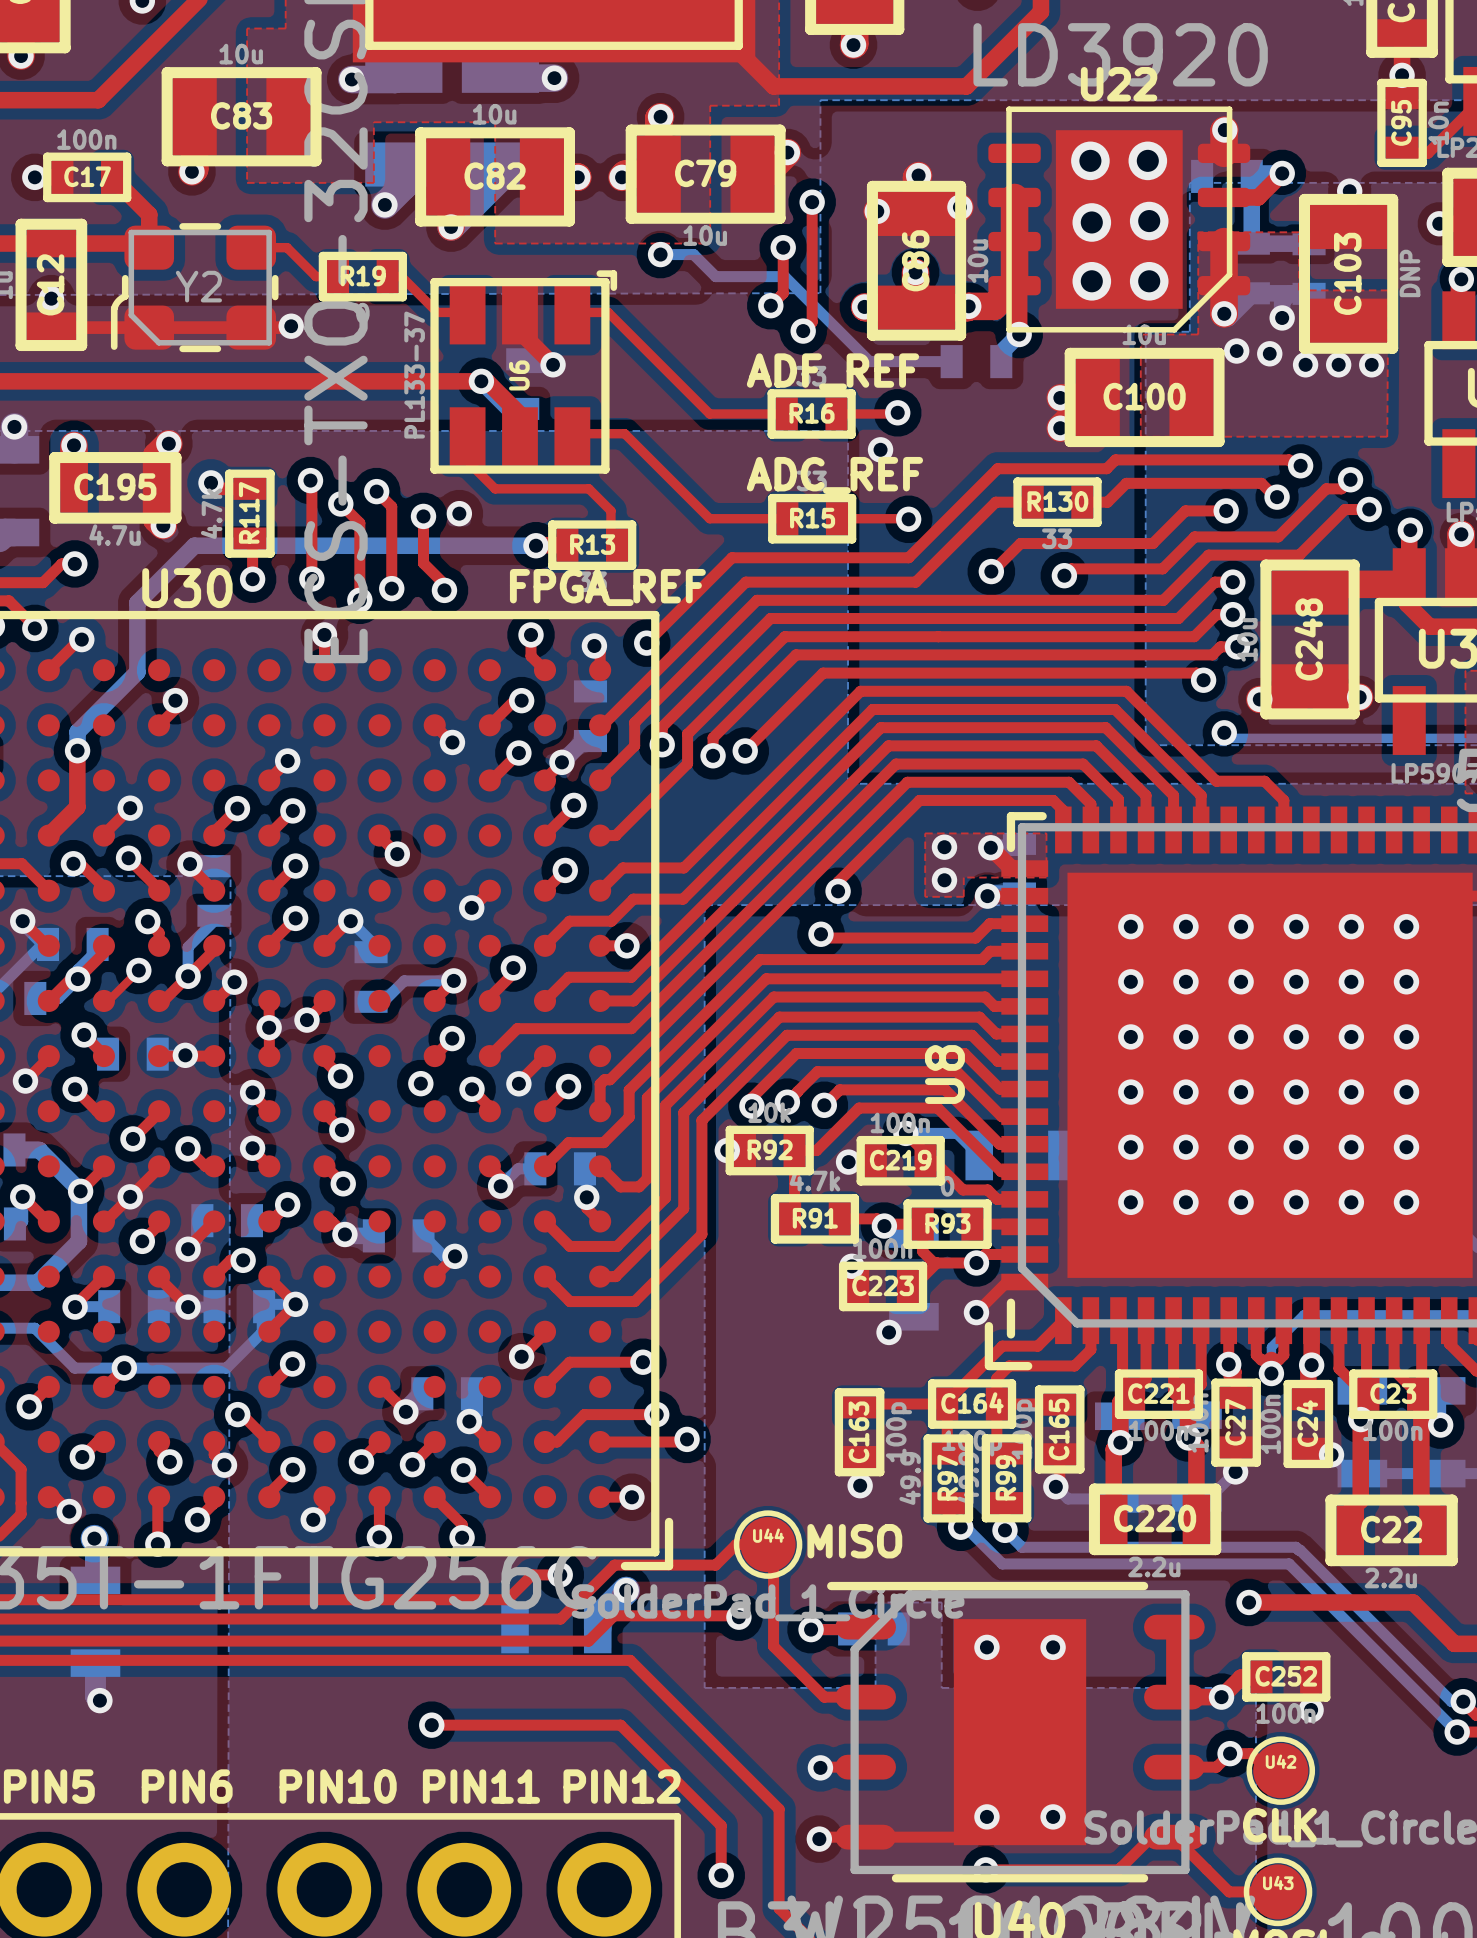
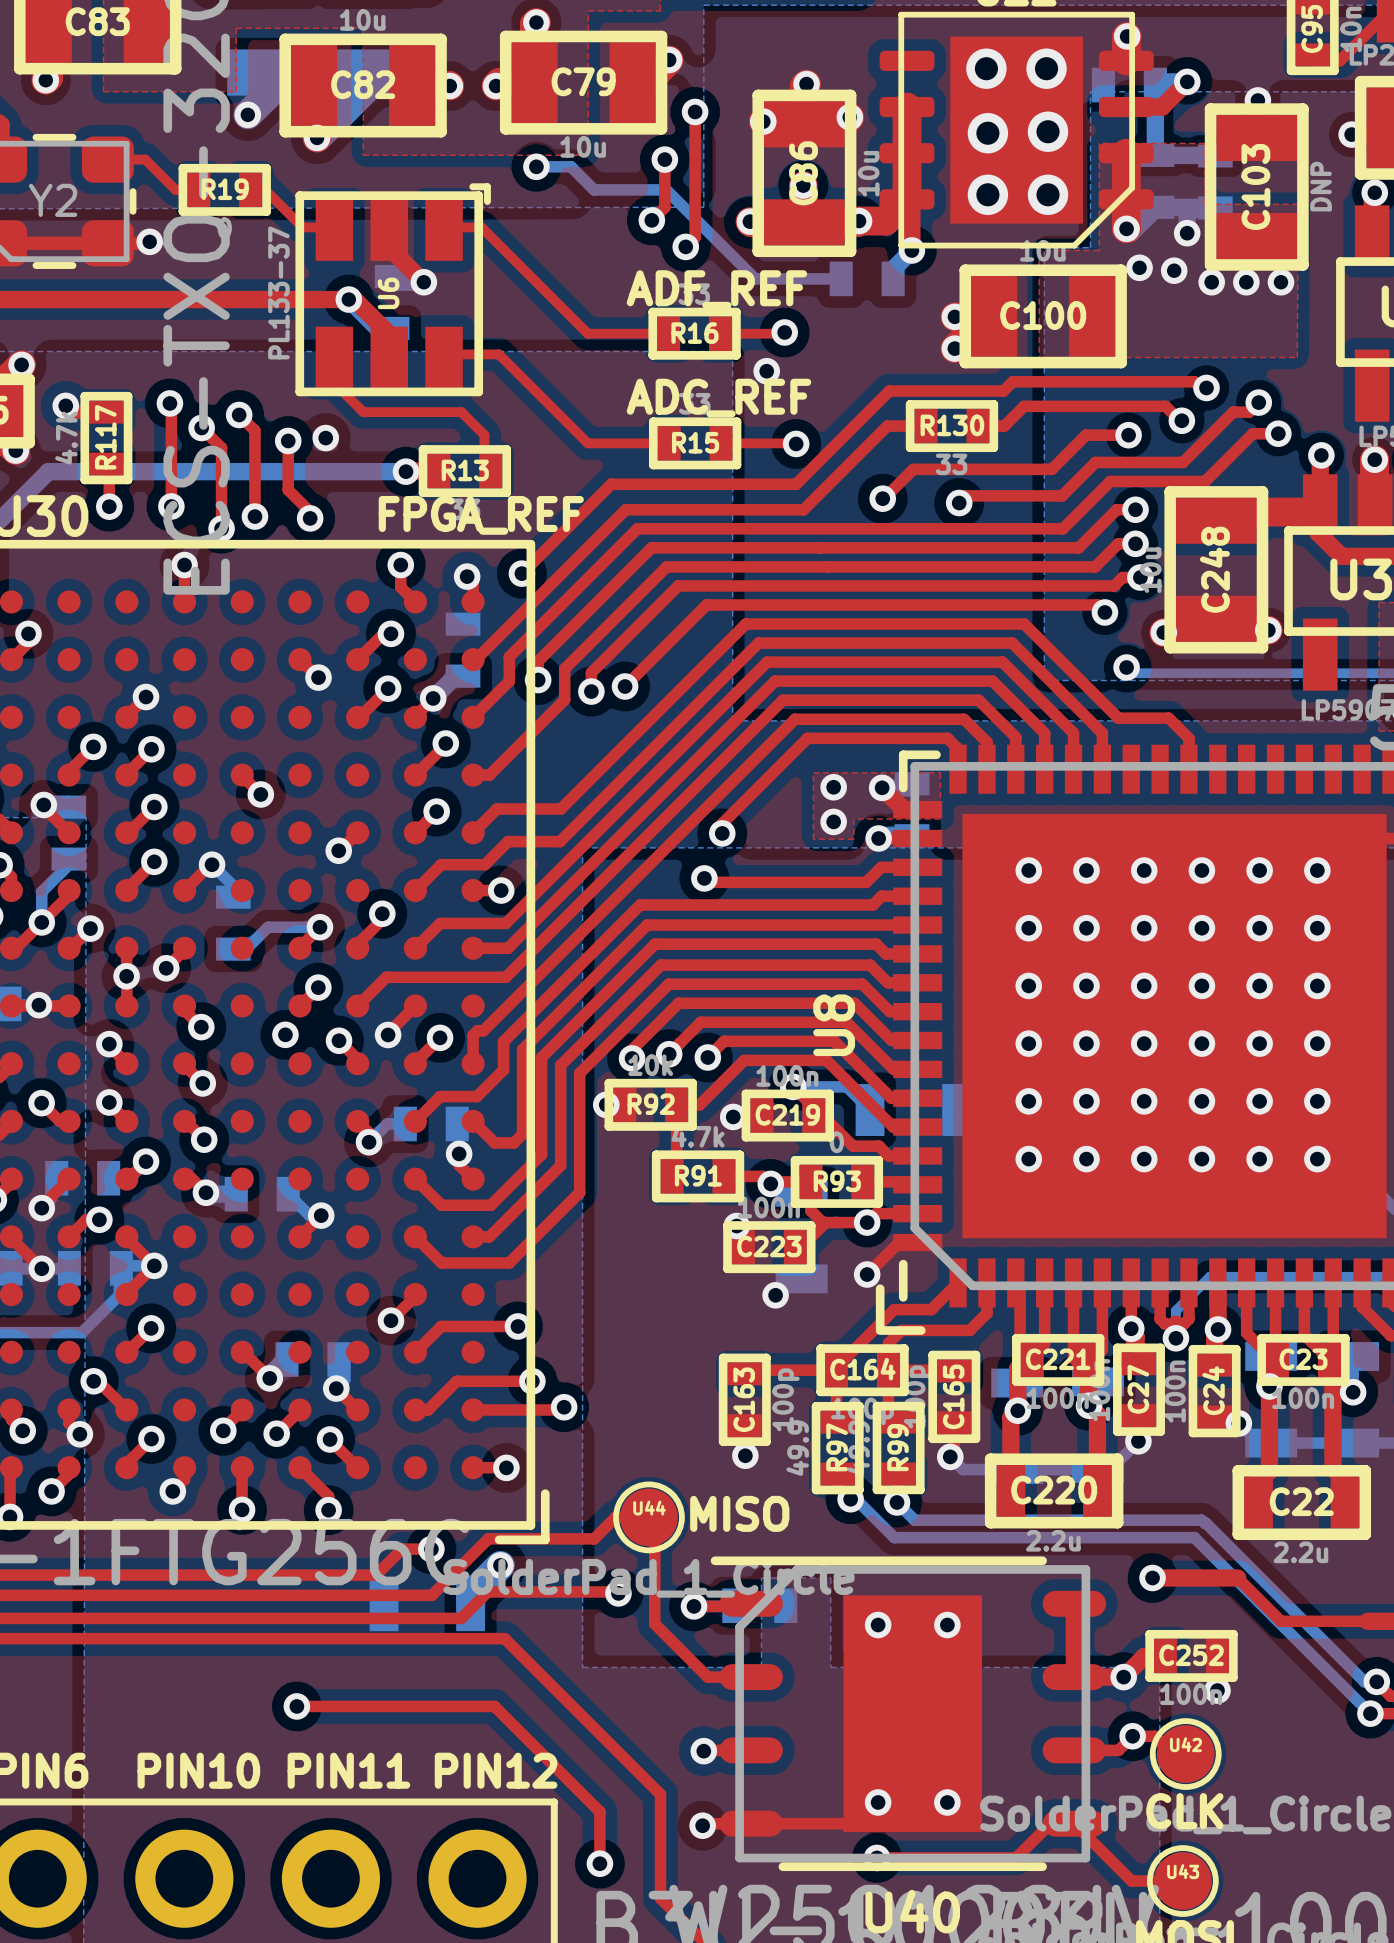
top track: (1330, 1602) (1413, 1602) (1454, 1643) -> (1237, 1578) (1280, 1621) (1367, 1621)

